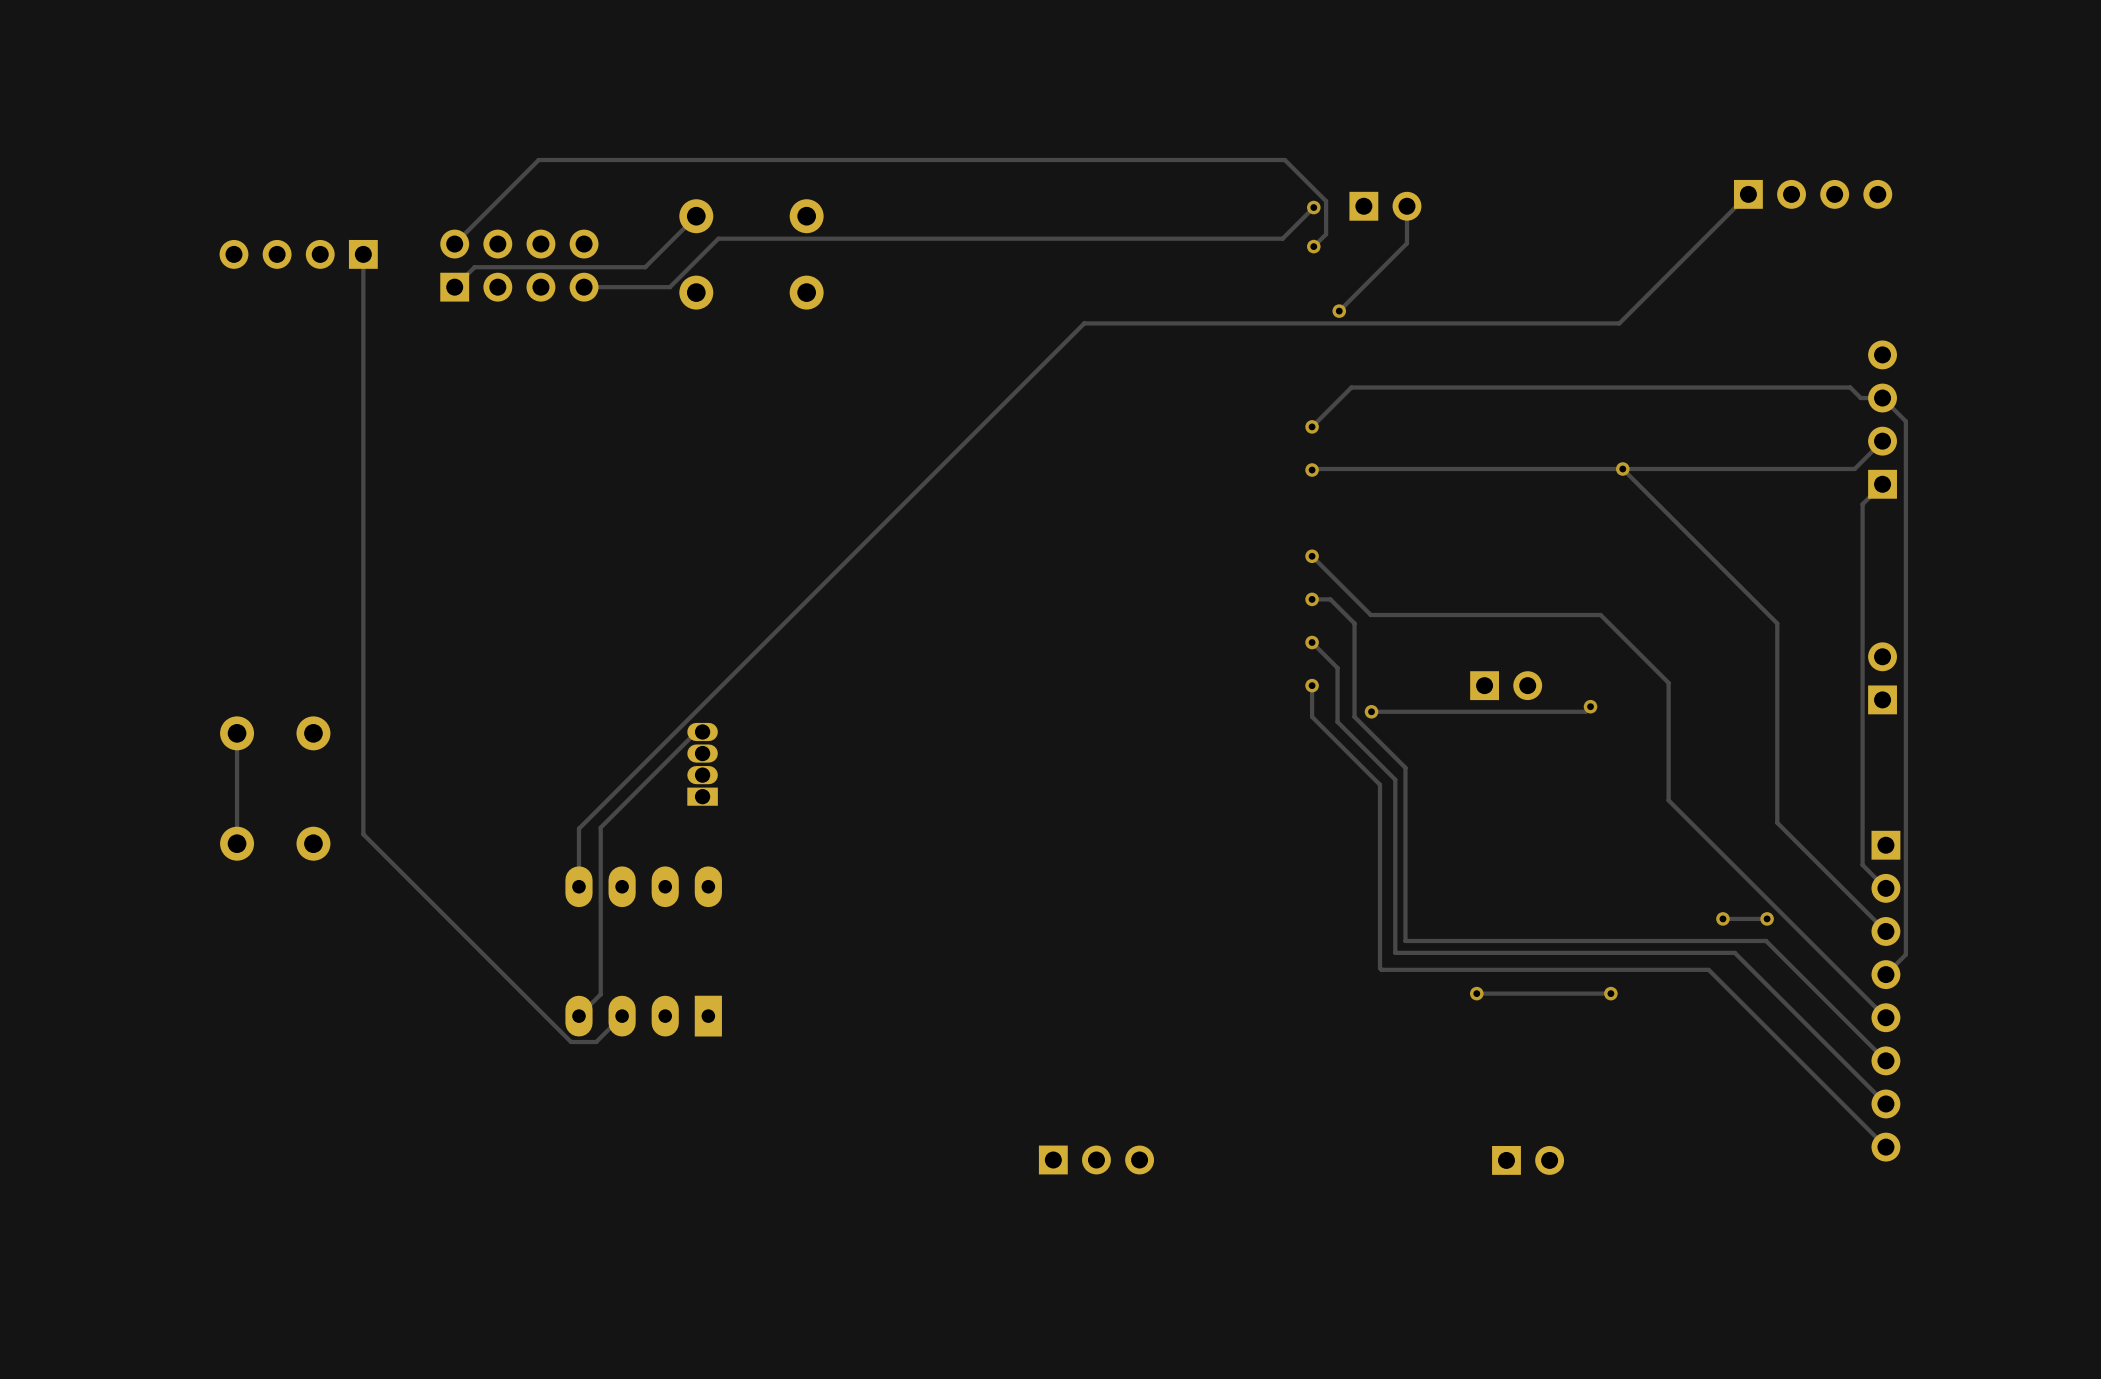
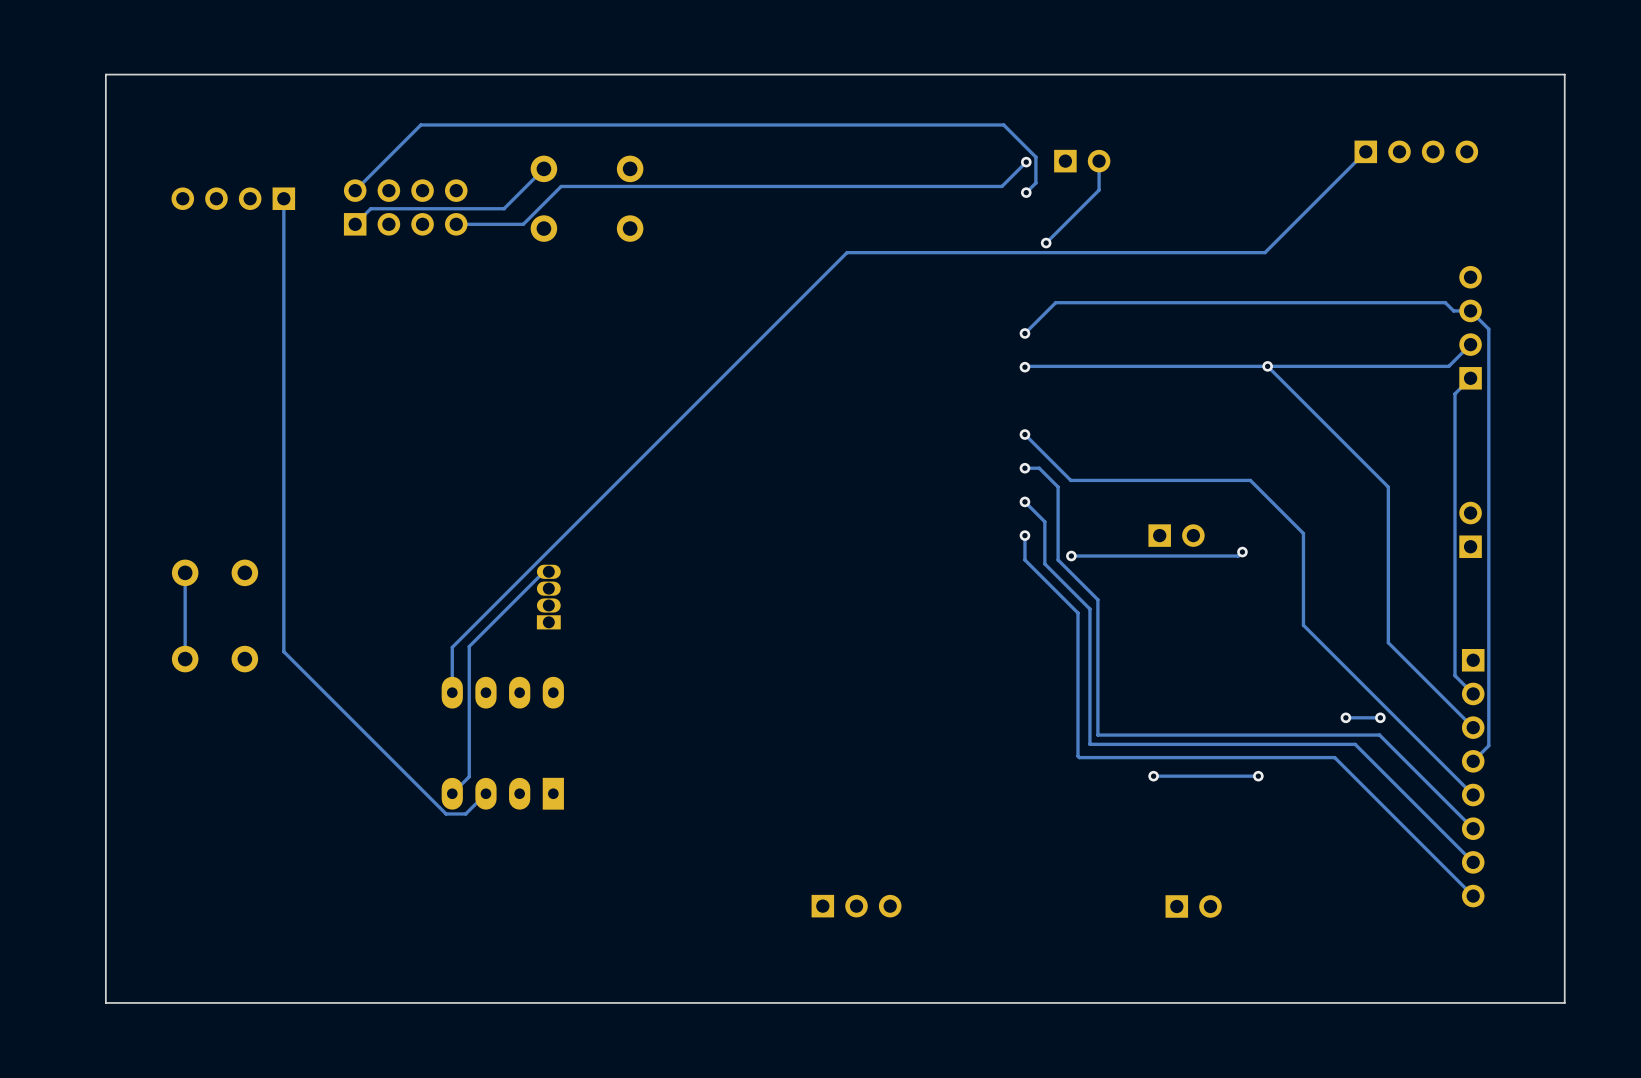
board edge: none -> (1564, 74) (105, 74) (105, 1002) (1564, 1002) (1564, 74)

